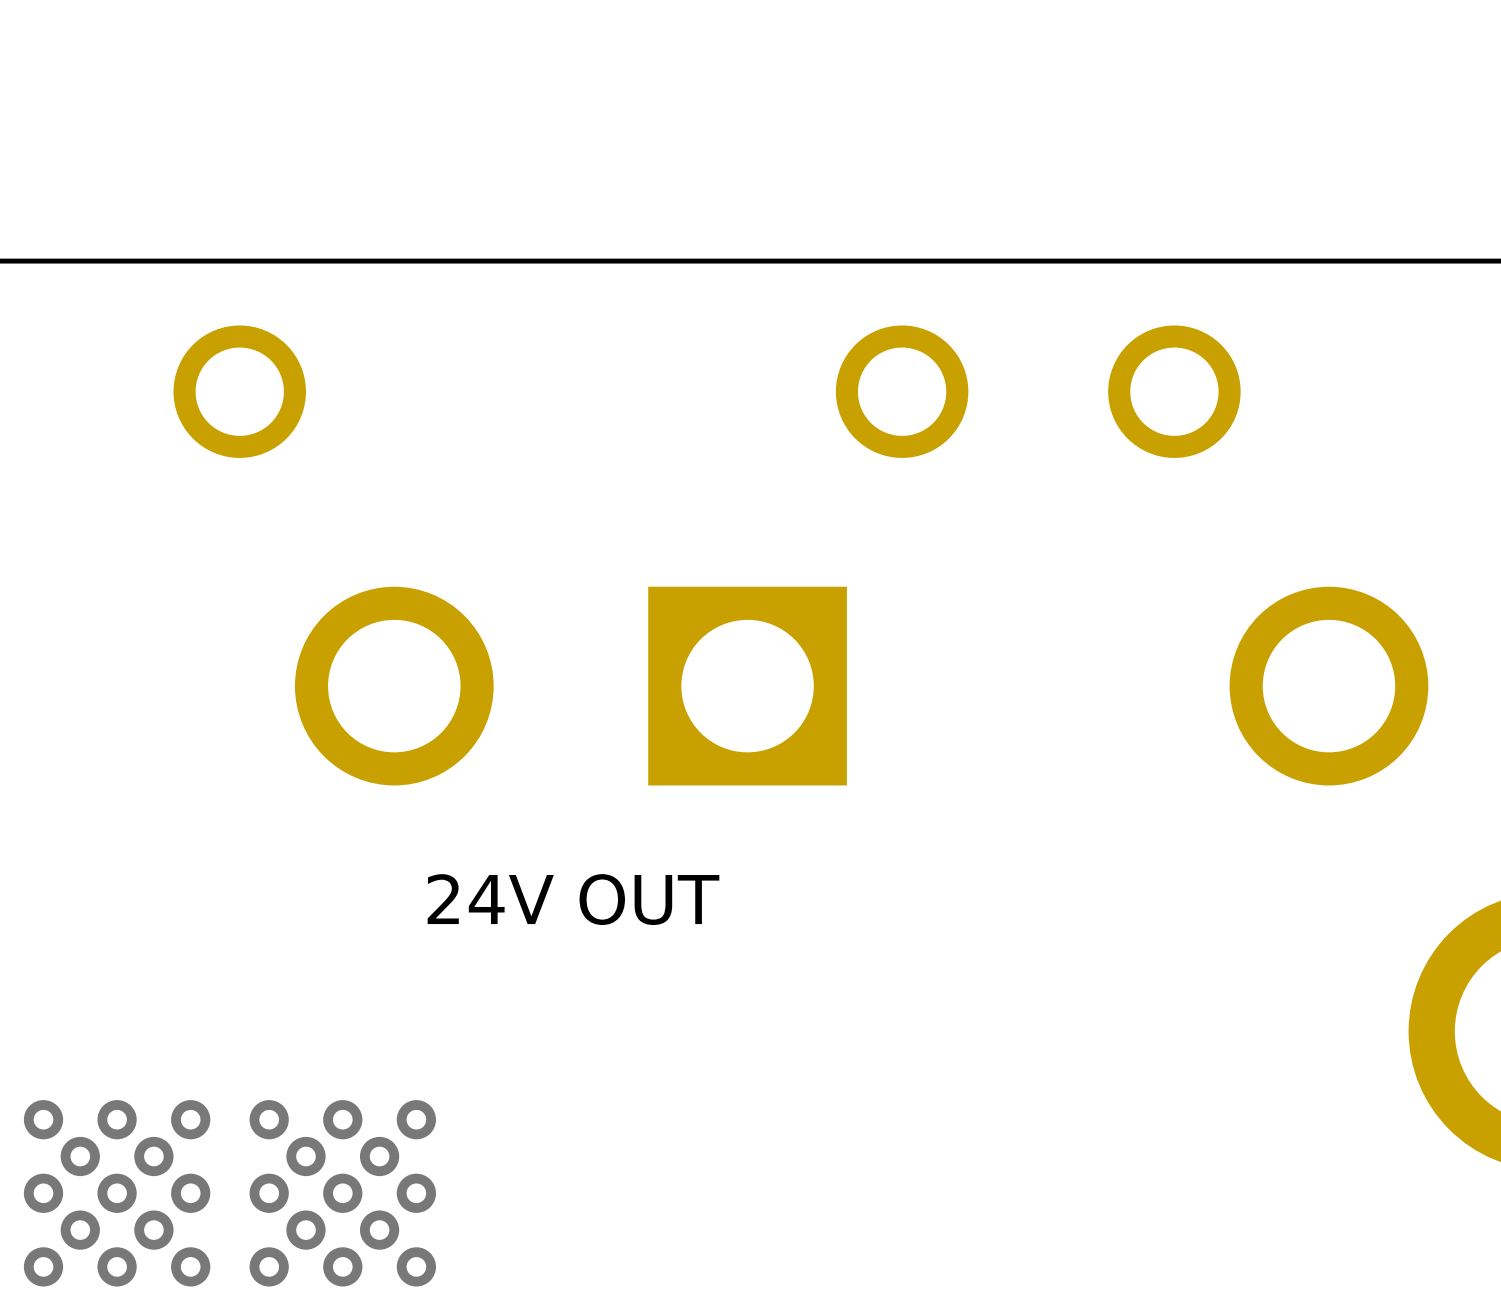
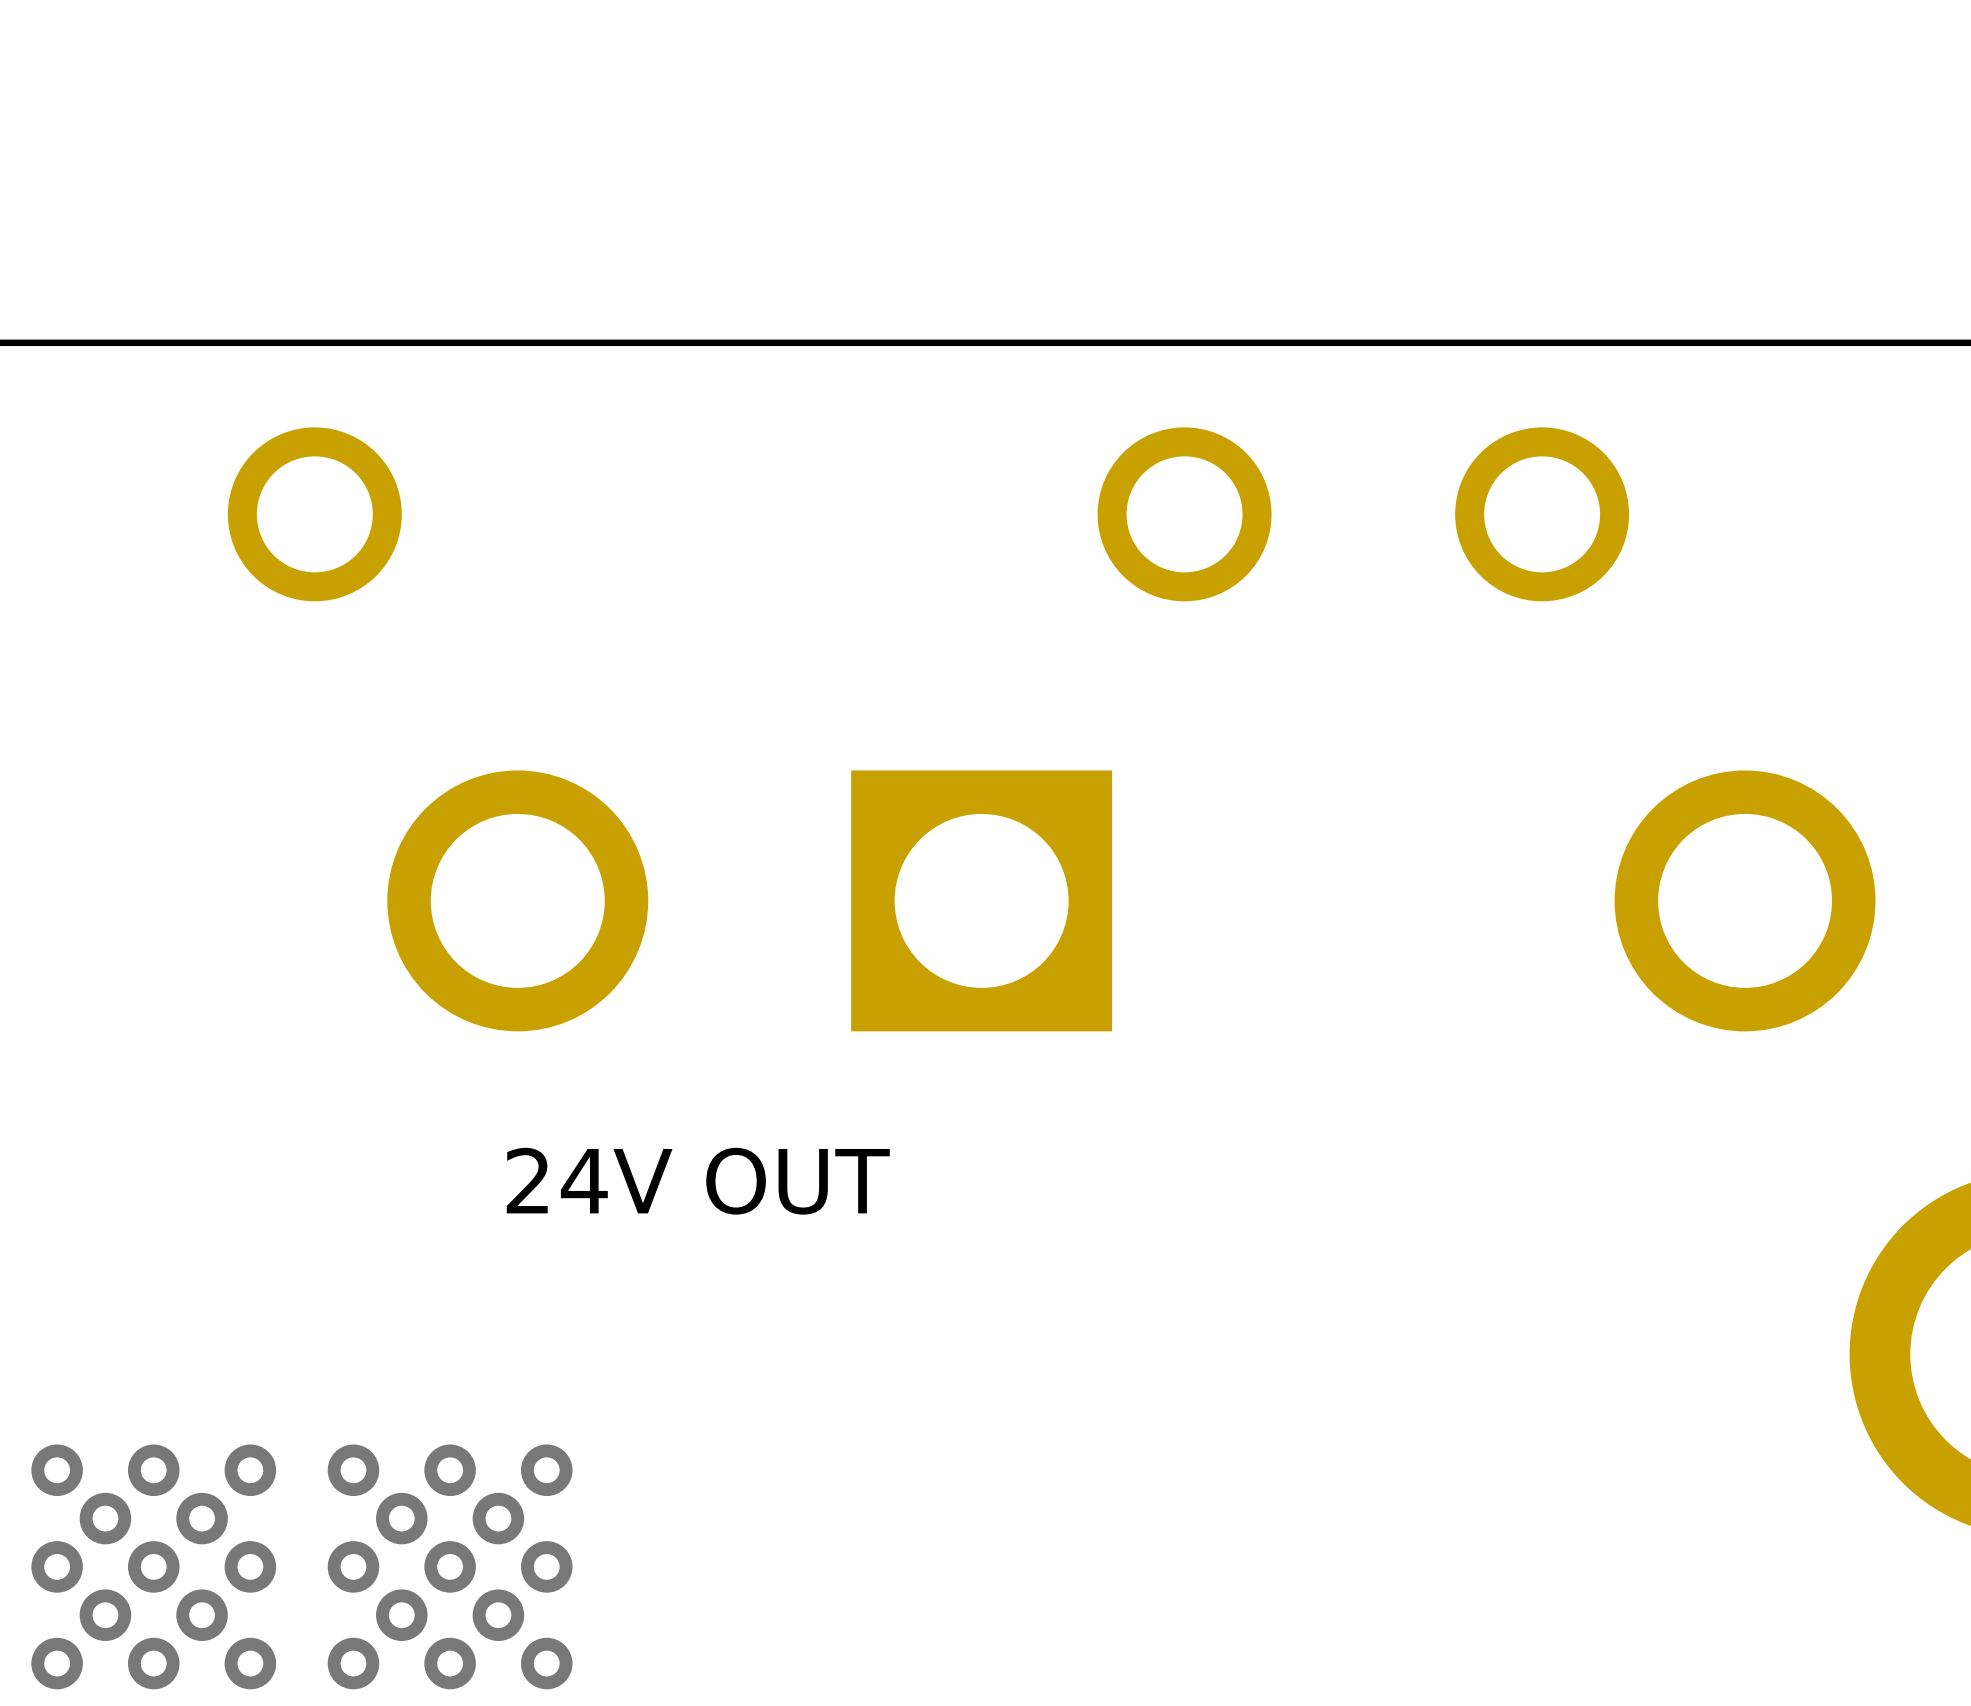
text position: 24V OUT (573, 899) -> 24V OUT (698, 1181)

